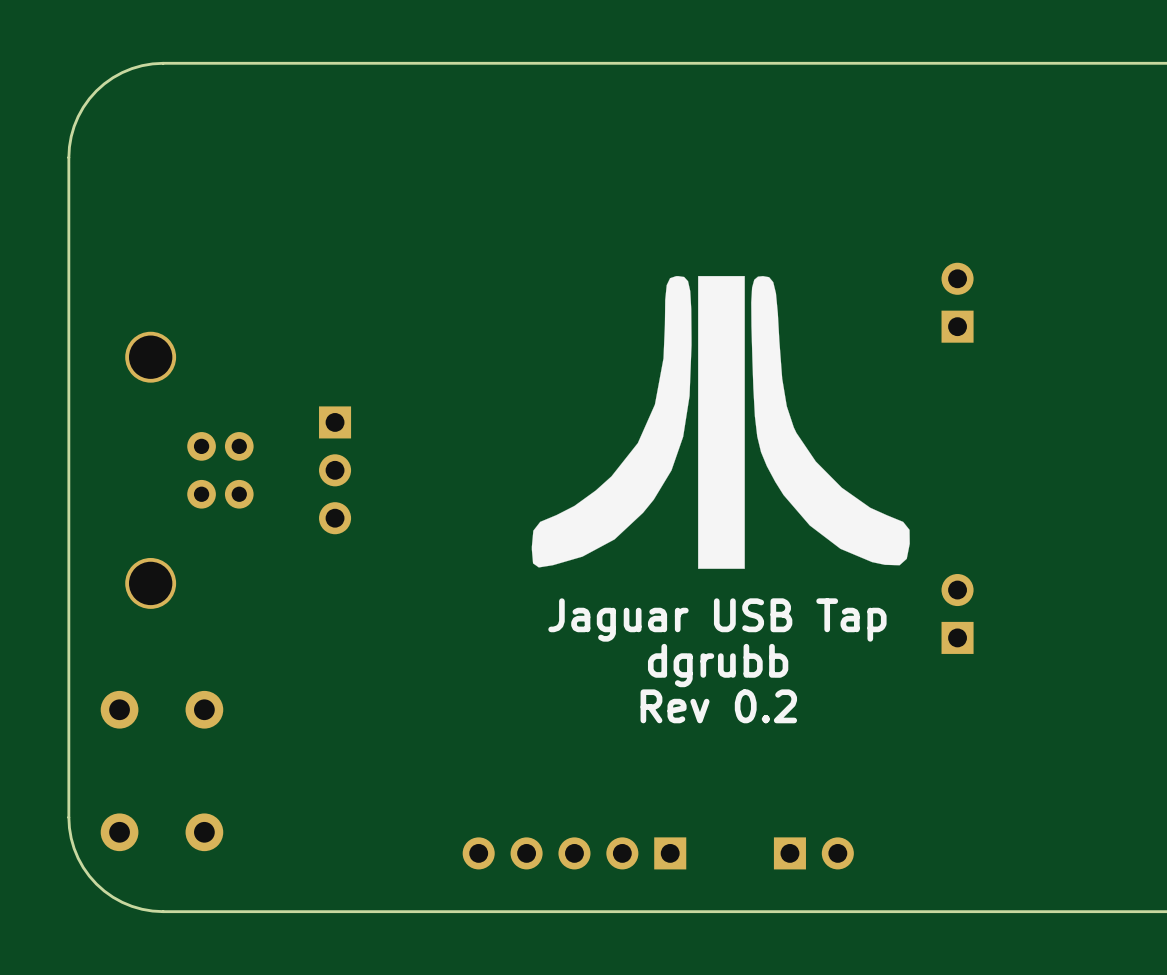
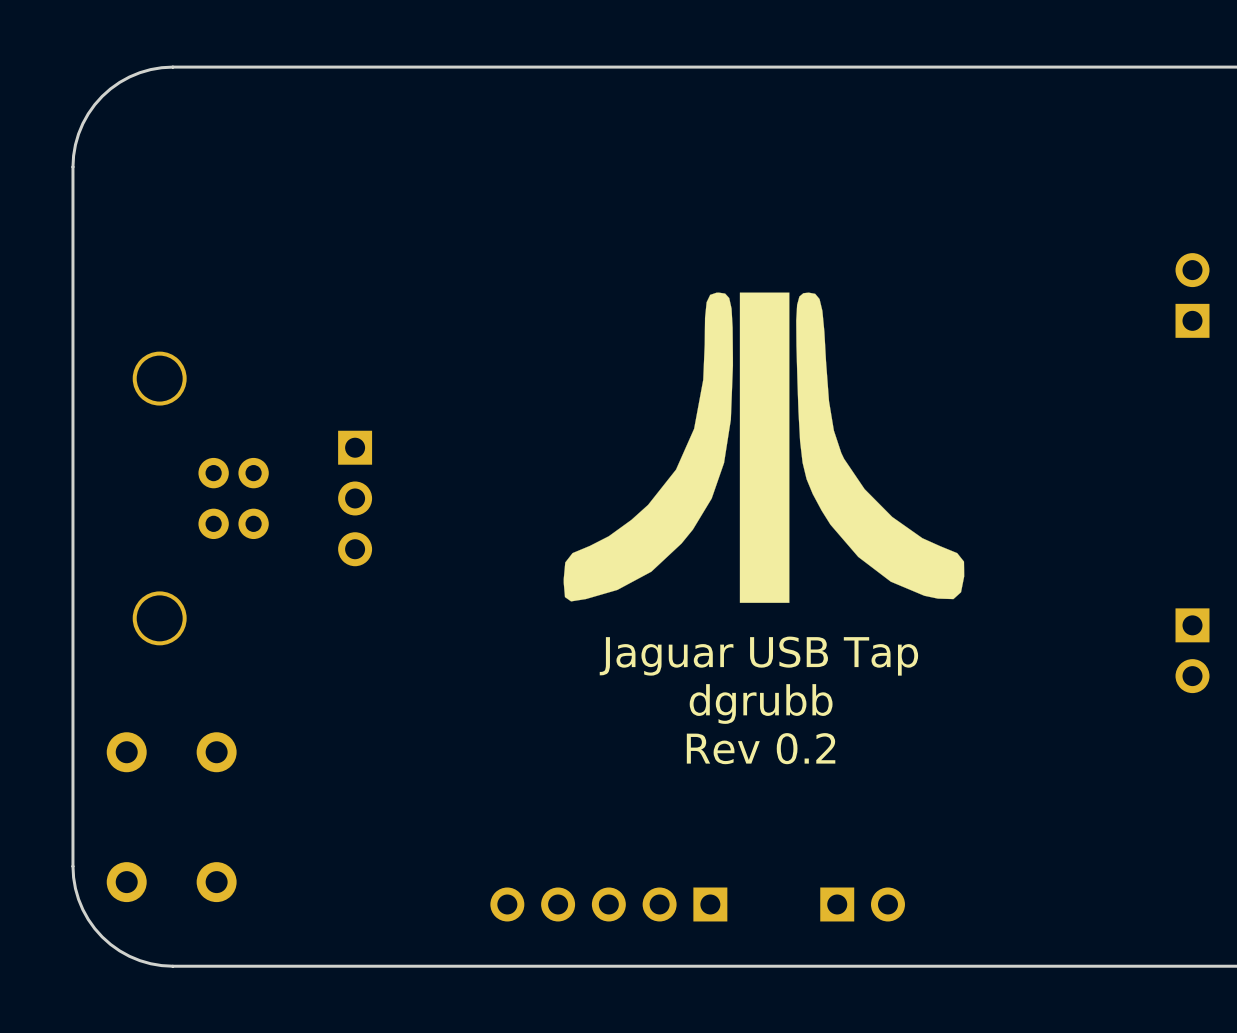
part position: (957, 302) -> (1192, 295)
part rotation: 0° (957, 613) -> 180° (1192, 650)
part position: (957, 613) -> (1192, 650)

